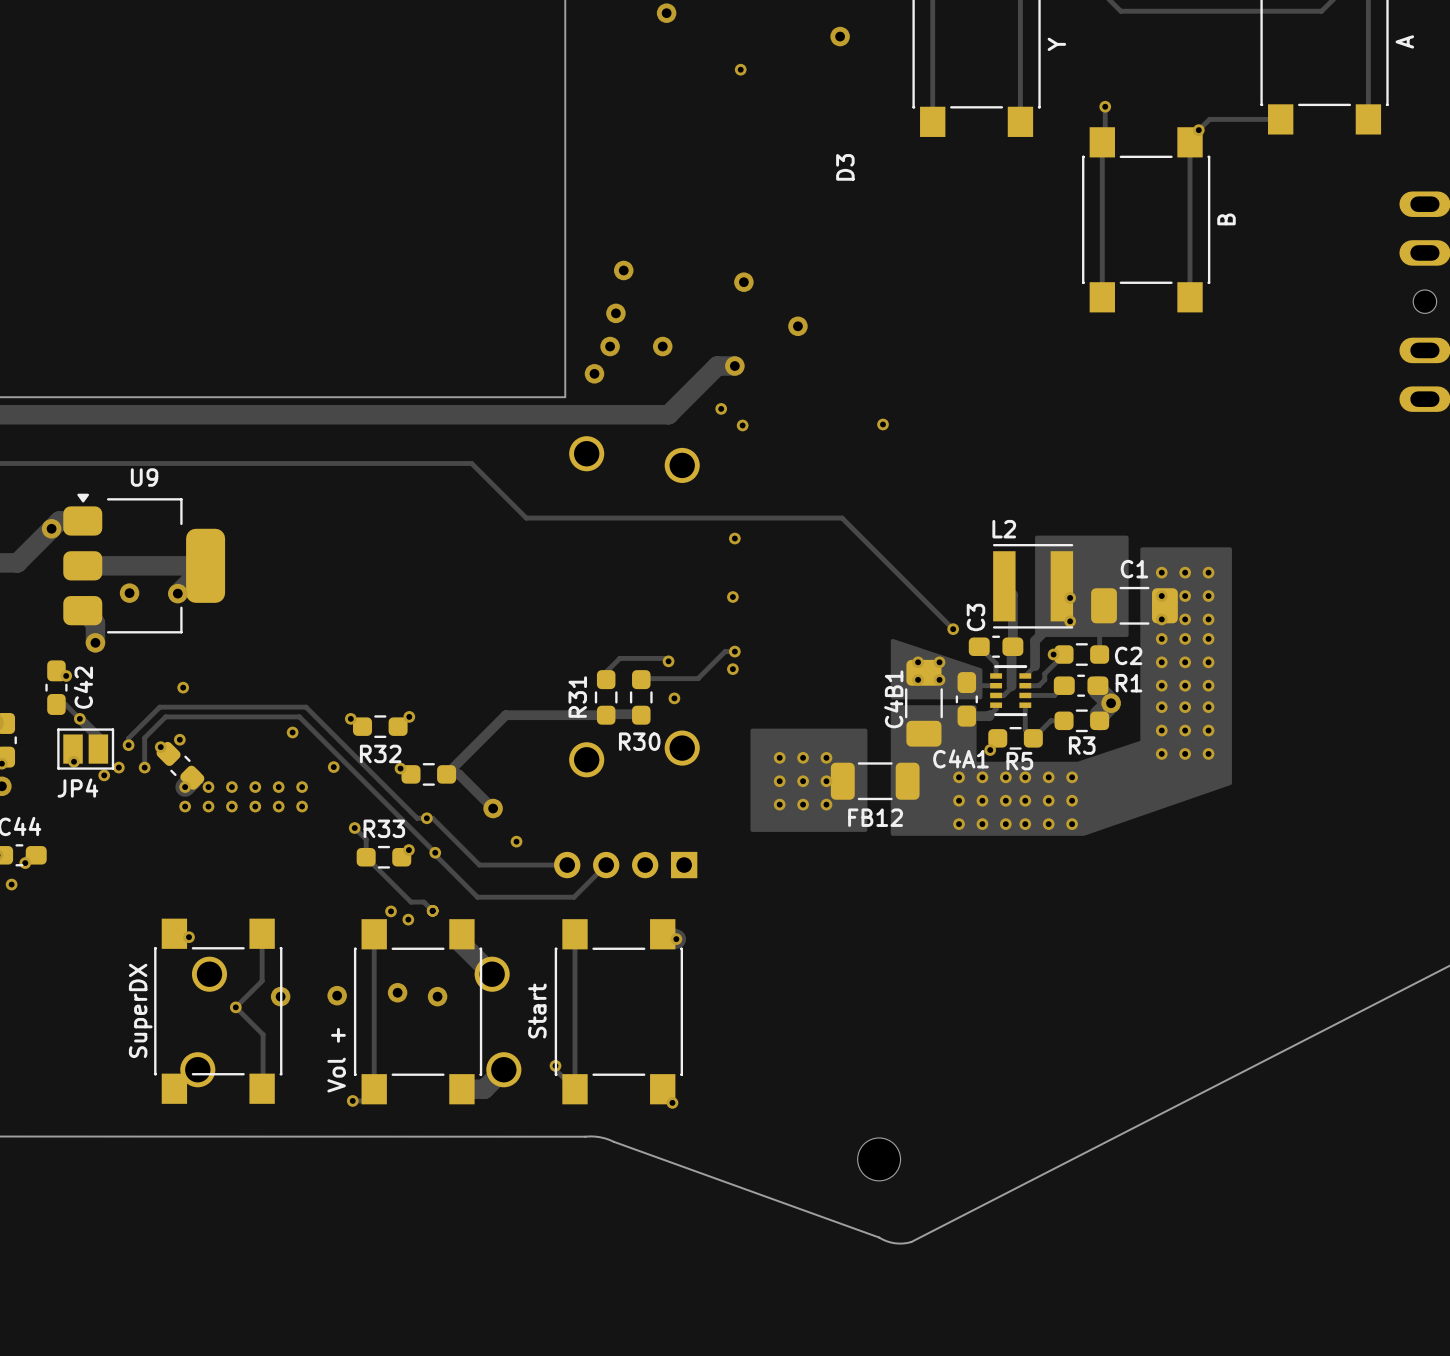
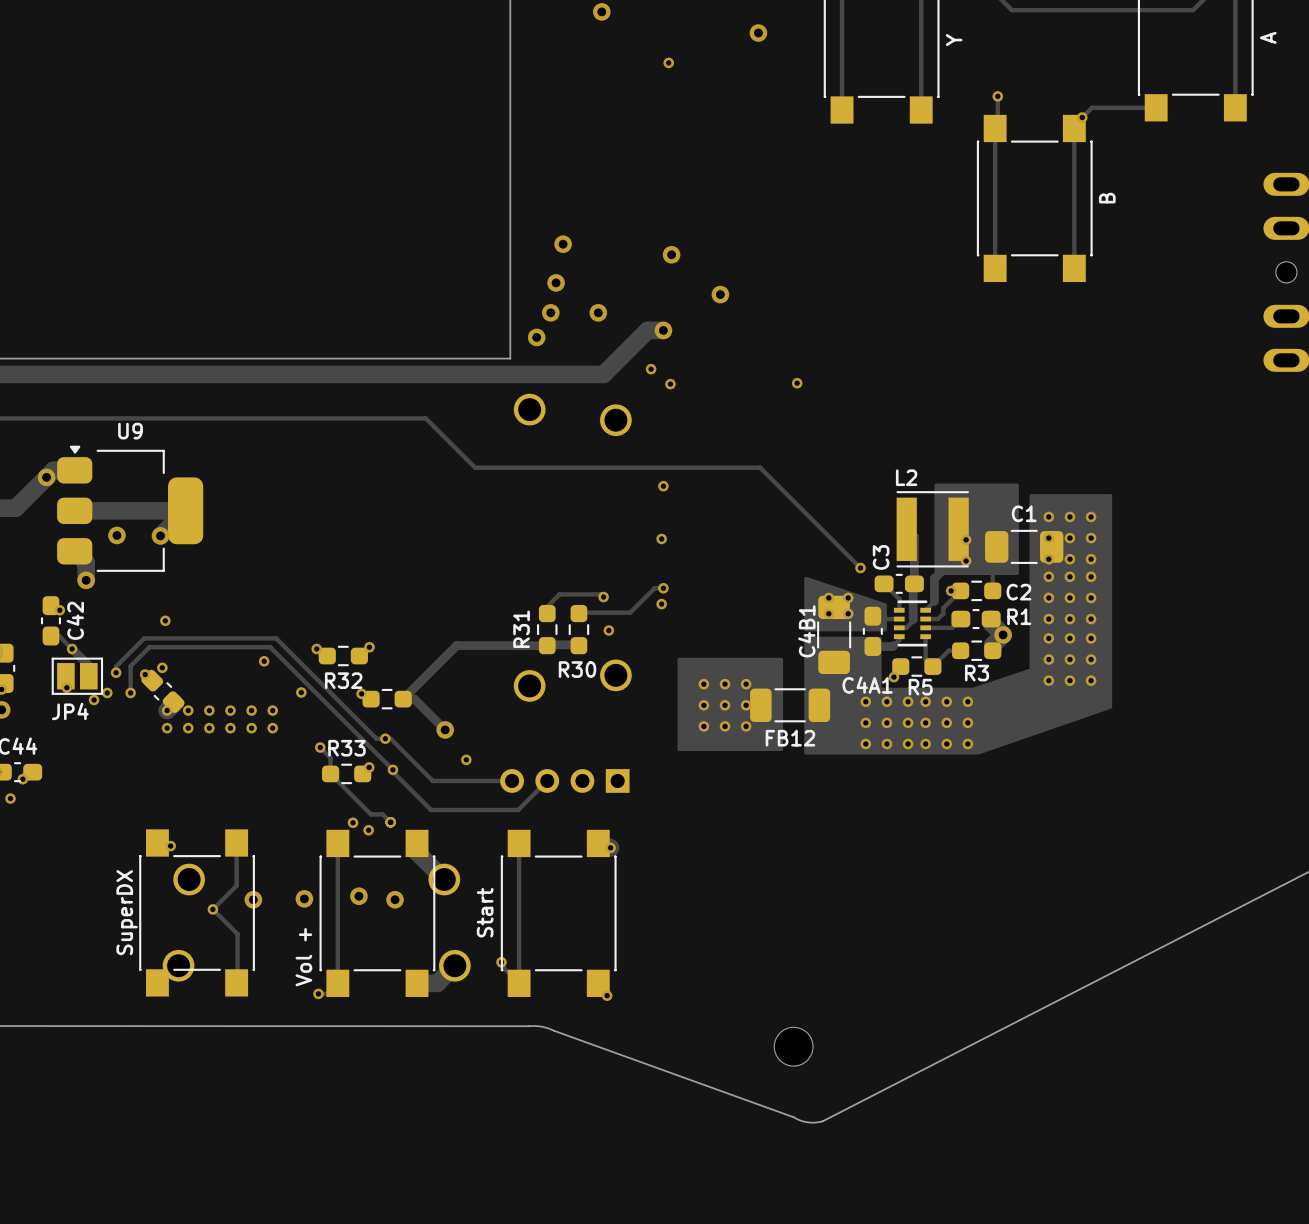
D3: (845, 167) -> none

